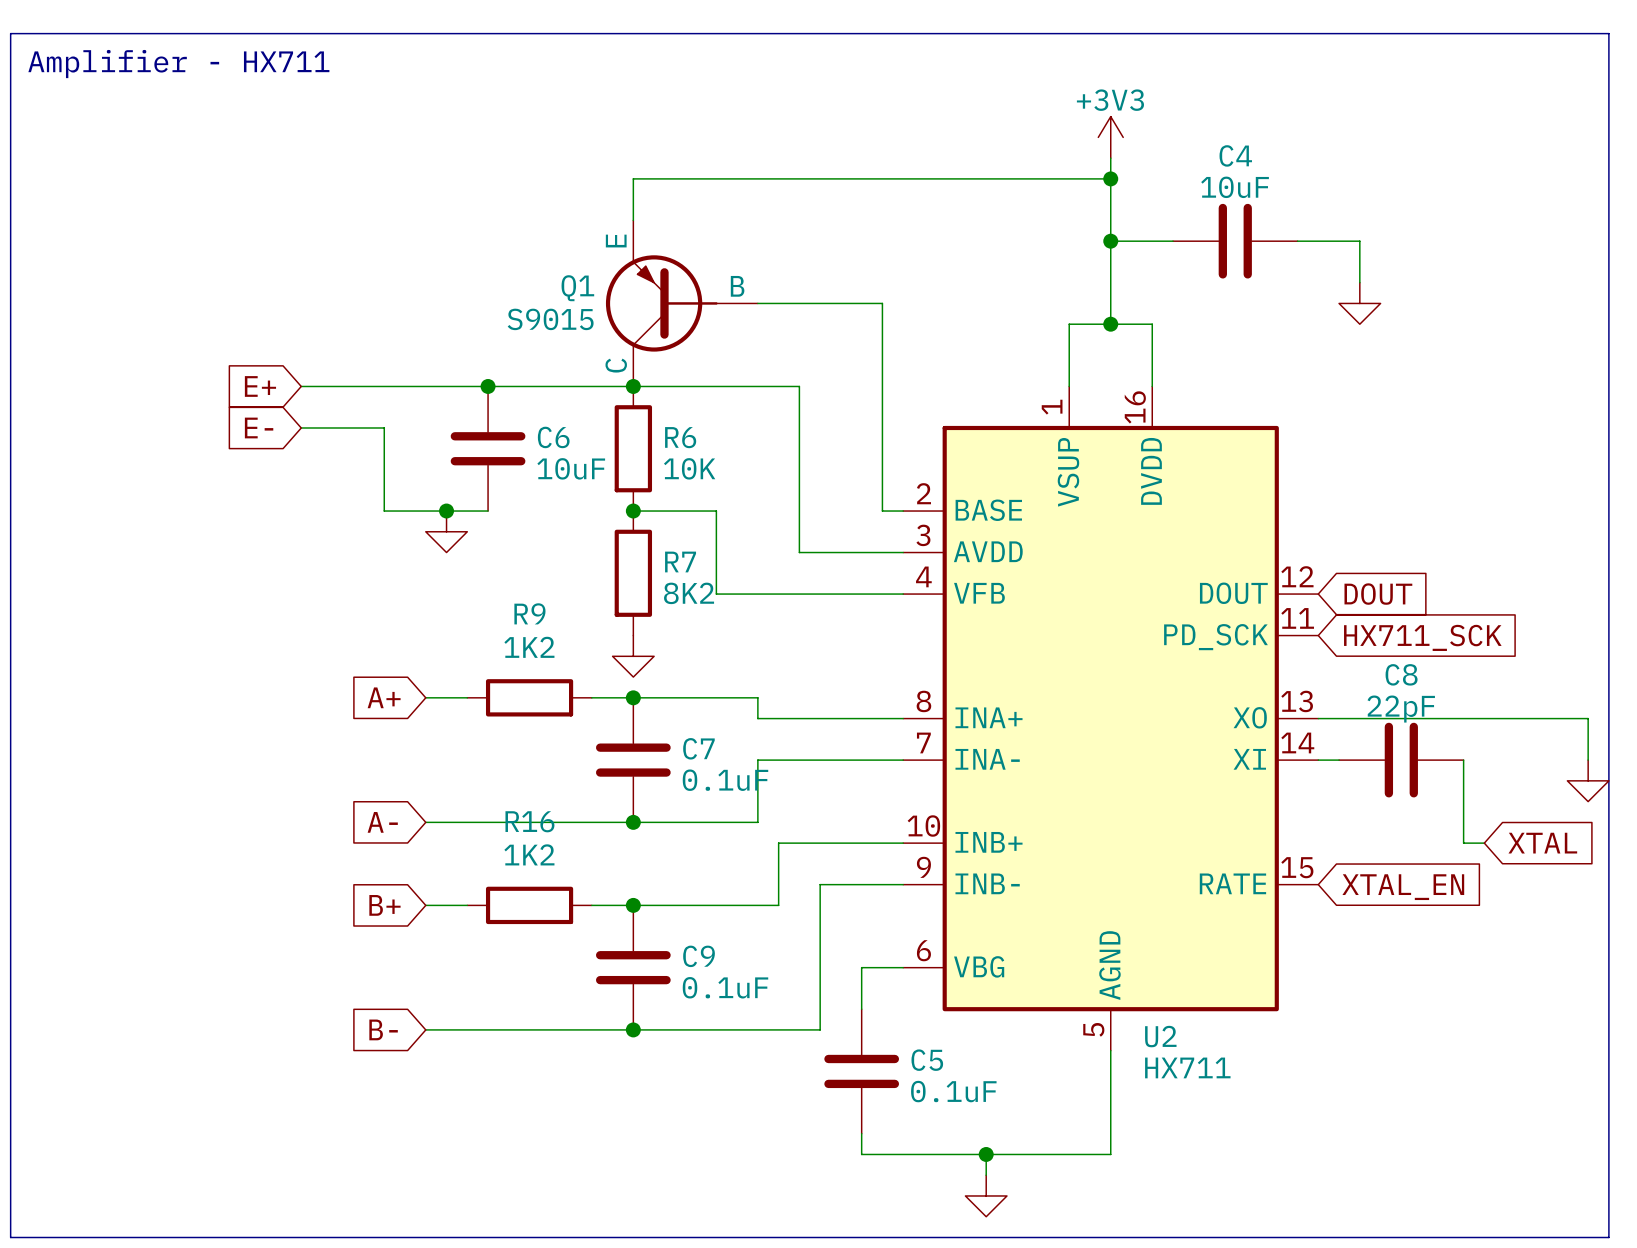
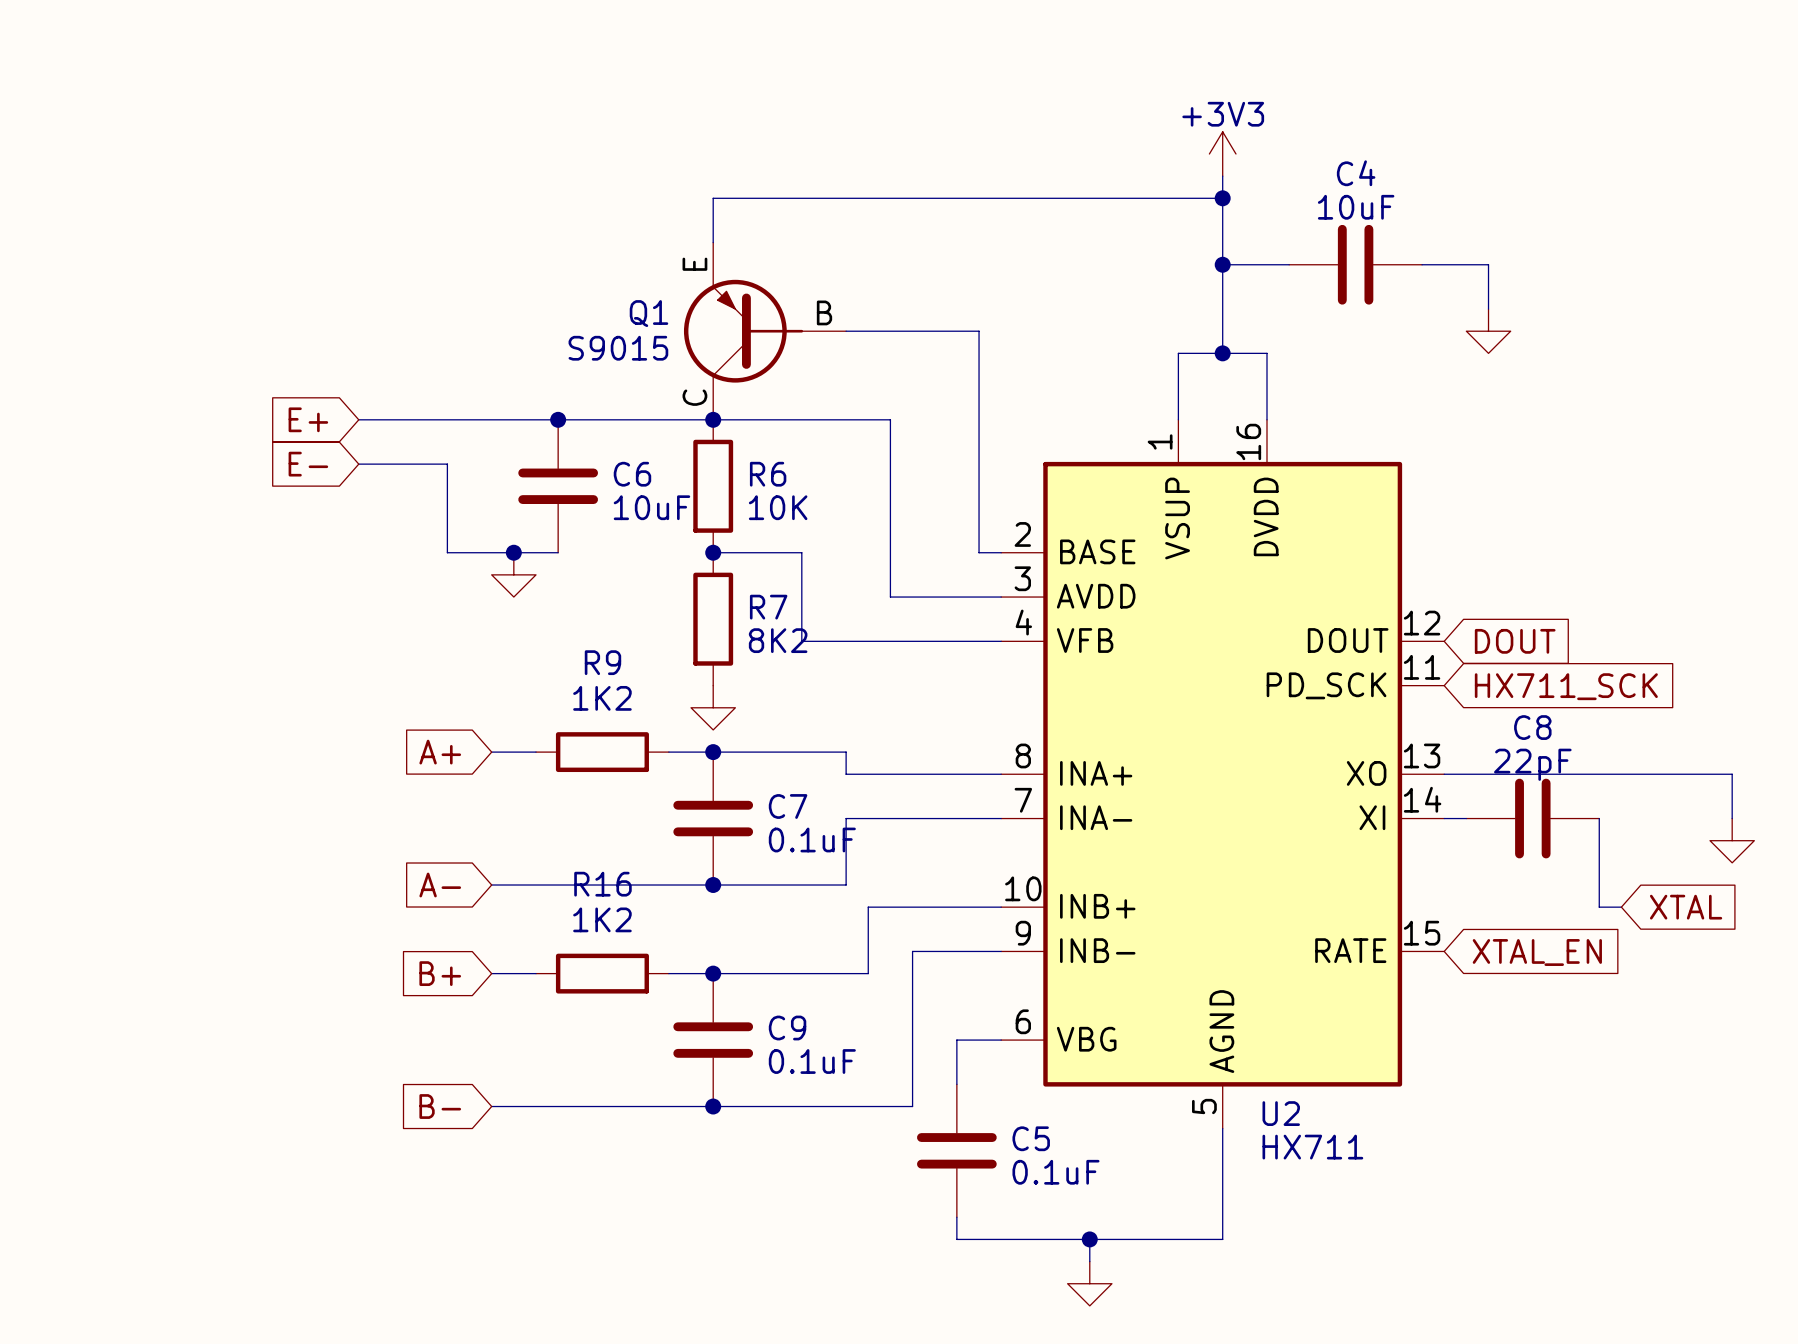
line: (10, 33) (1608, 33) (1608, 1237) (10, 1237) (10, 33) -> none
text: Amplifier - HX711 (178, 64) -> none

